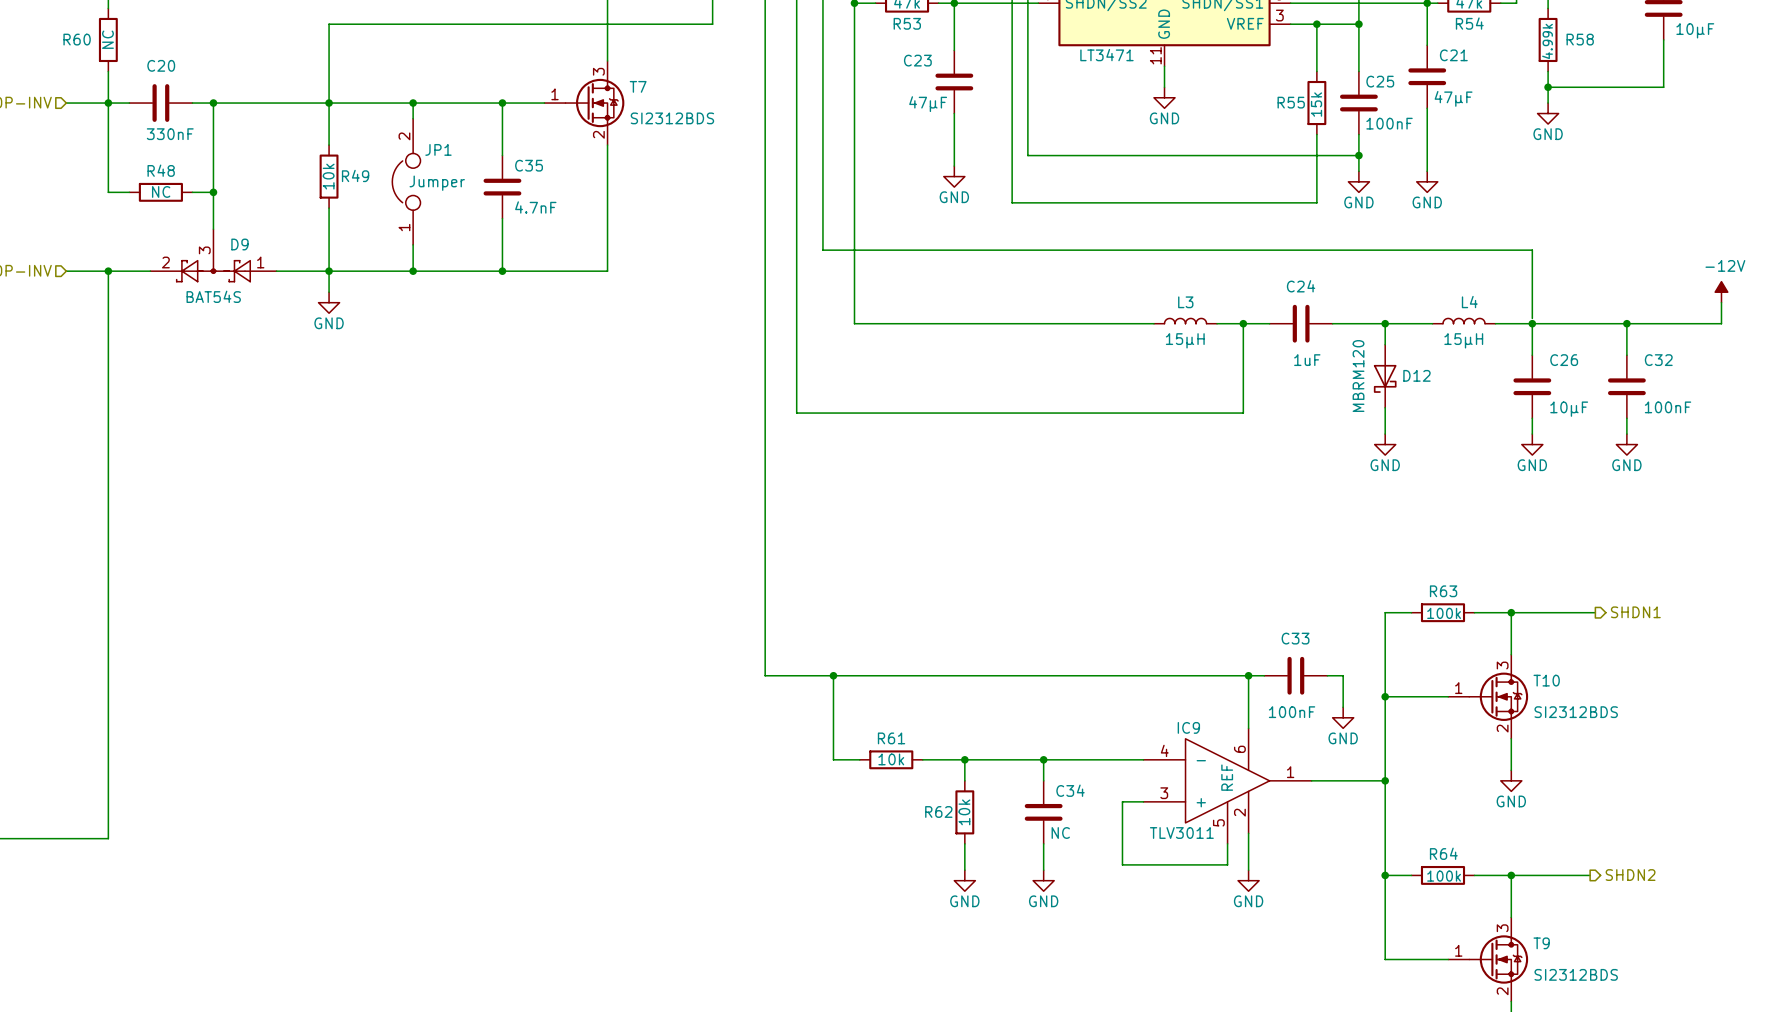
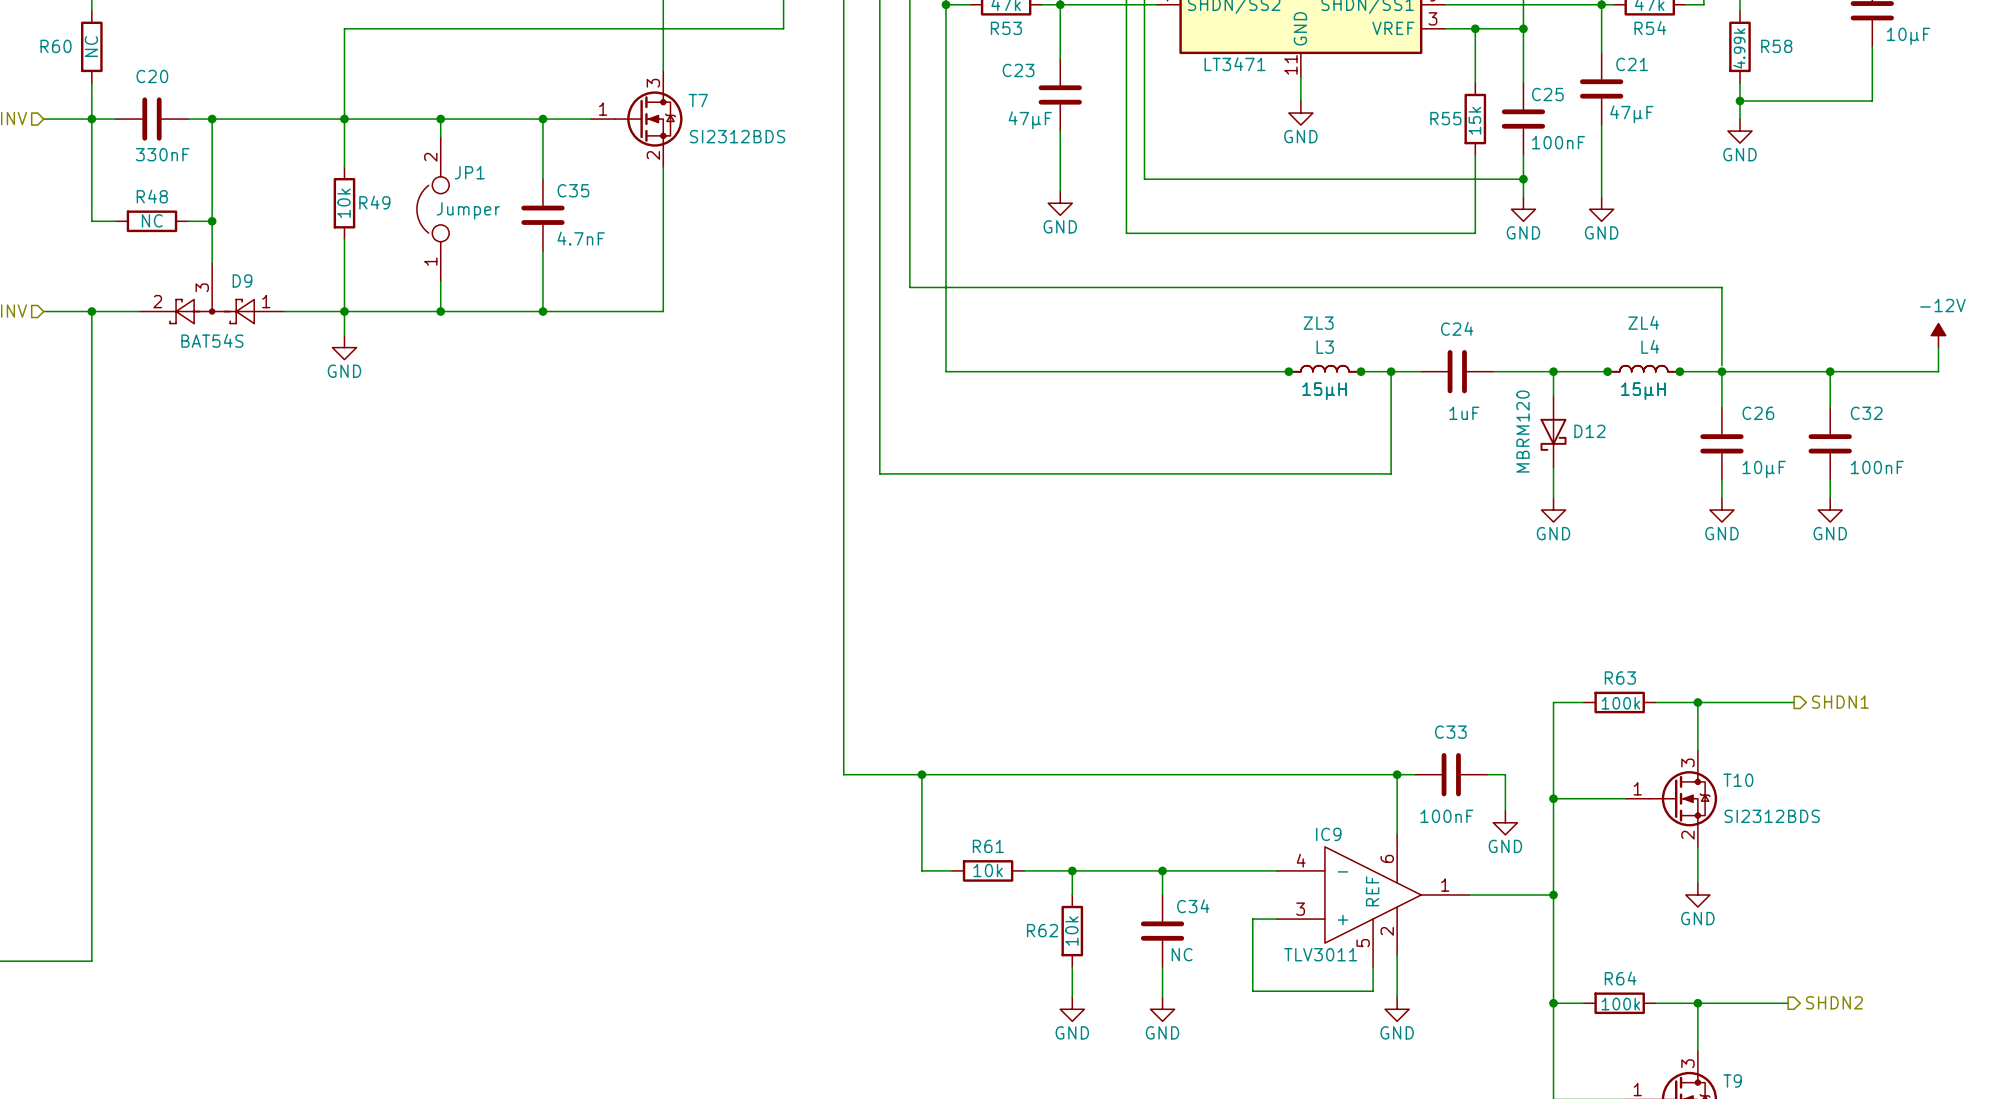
ZL3: none -> 15μH (1324, 368)
ZL4: none -> 15μH (1643, 368)
junction: none -> (1288, 371)
junction: none -> (1361, 371)
junction: none -> (1607, 371)
junction: none -> (1679, 371)

